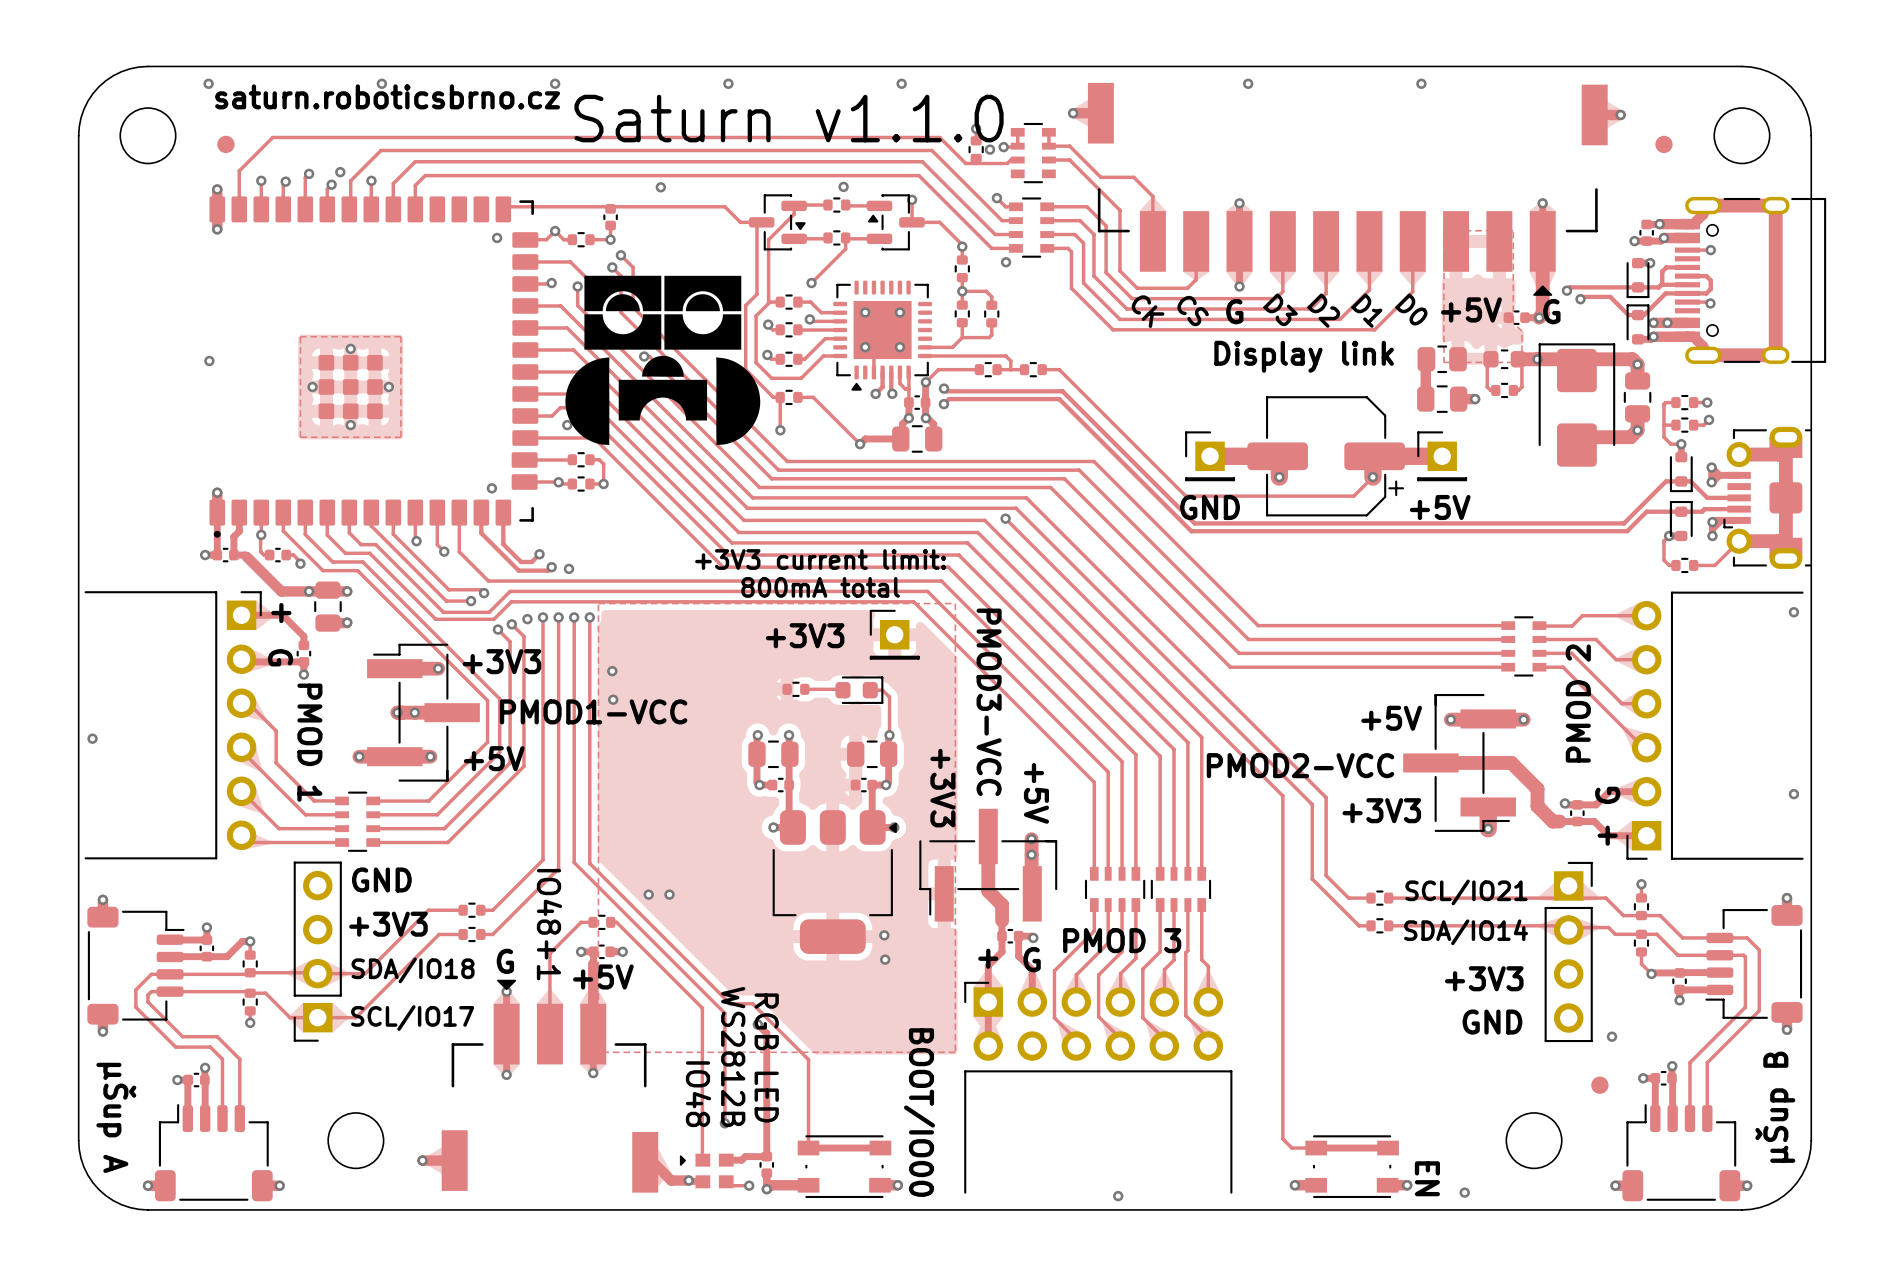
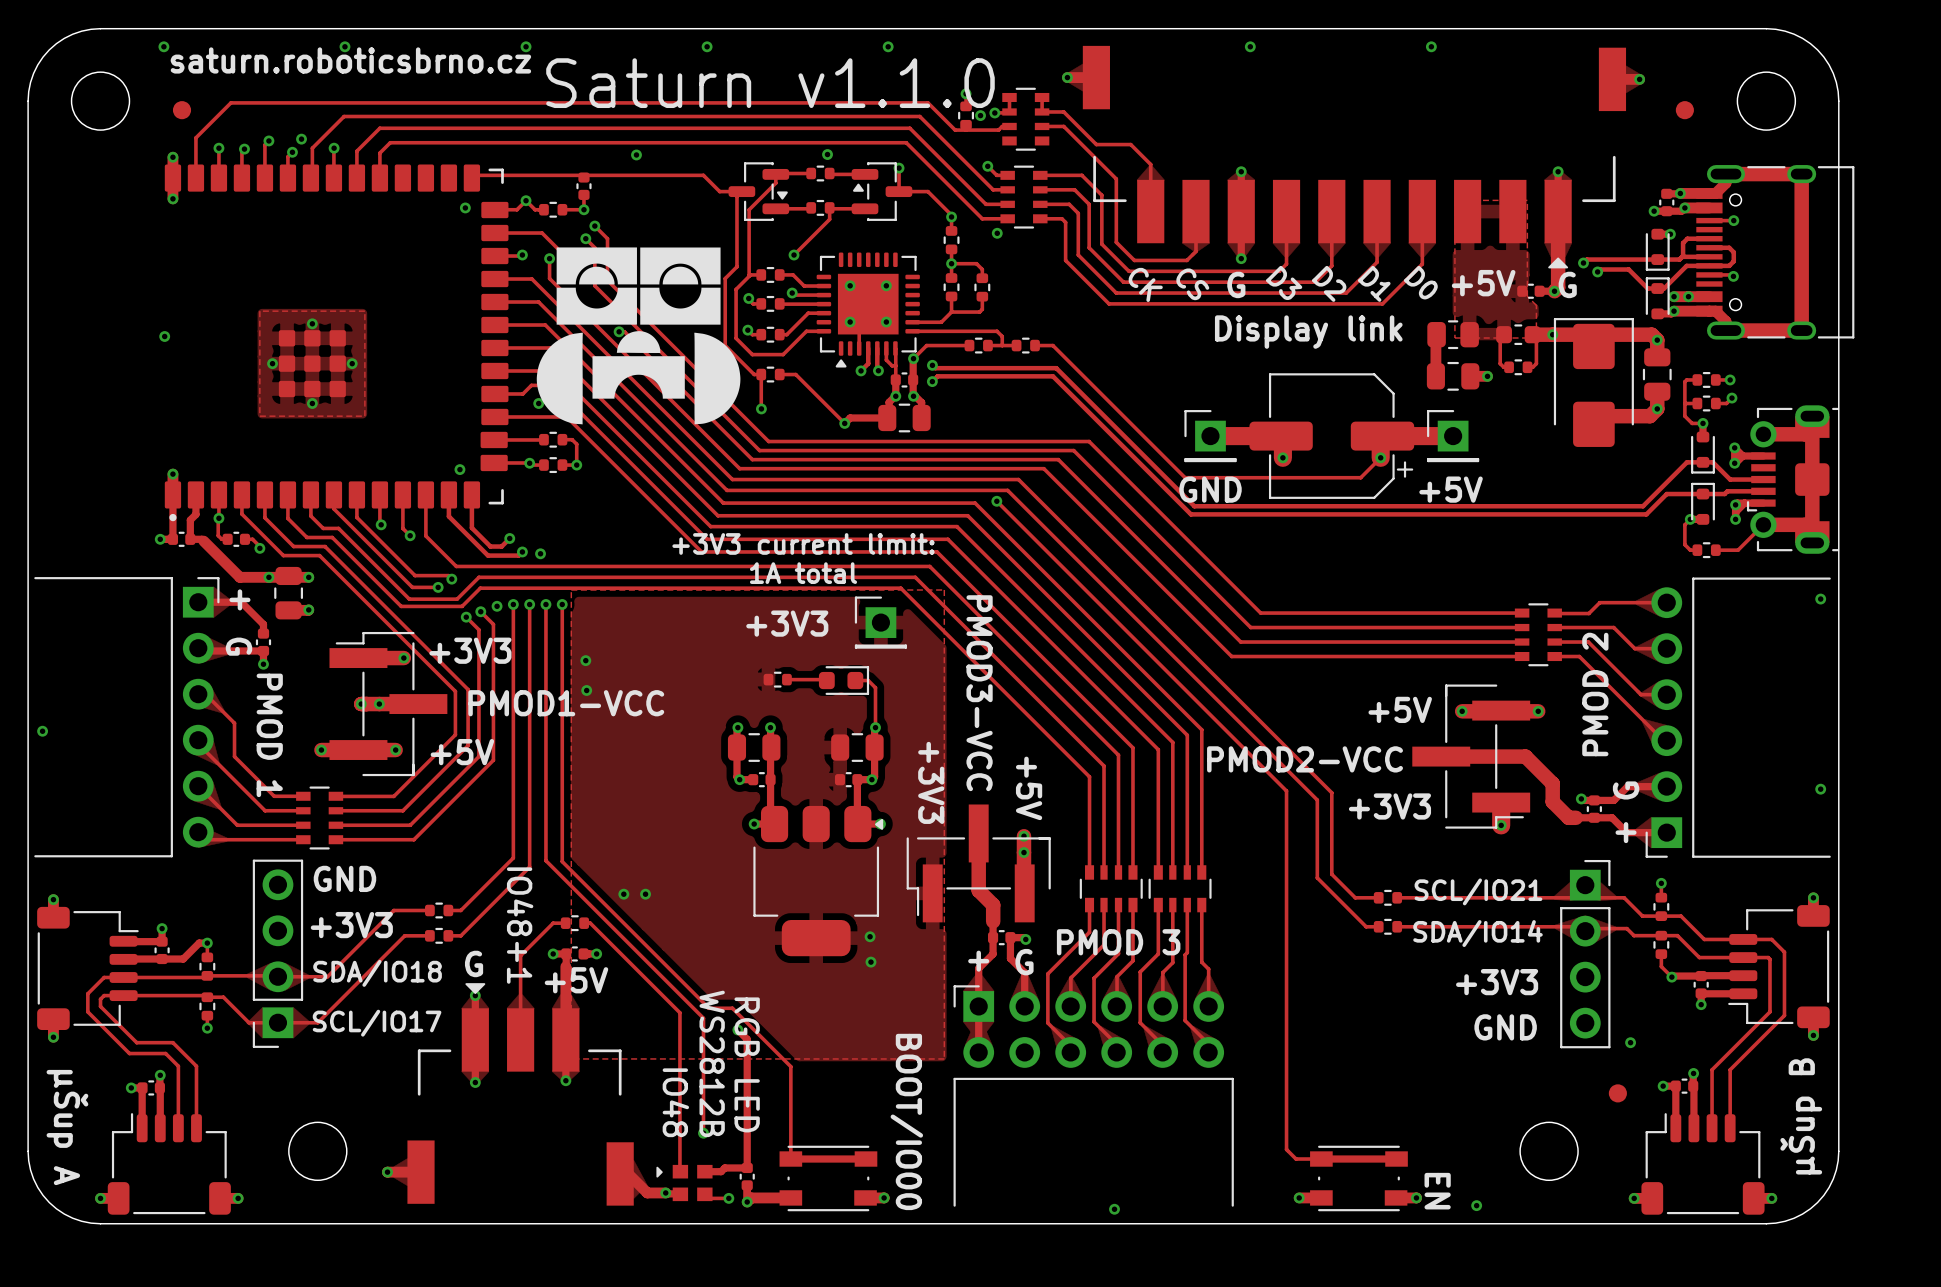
text: 800mA total (820, 587) -> 1A total (803, 573)

